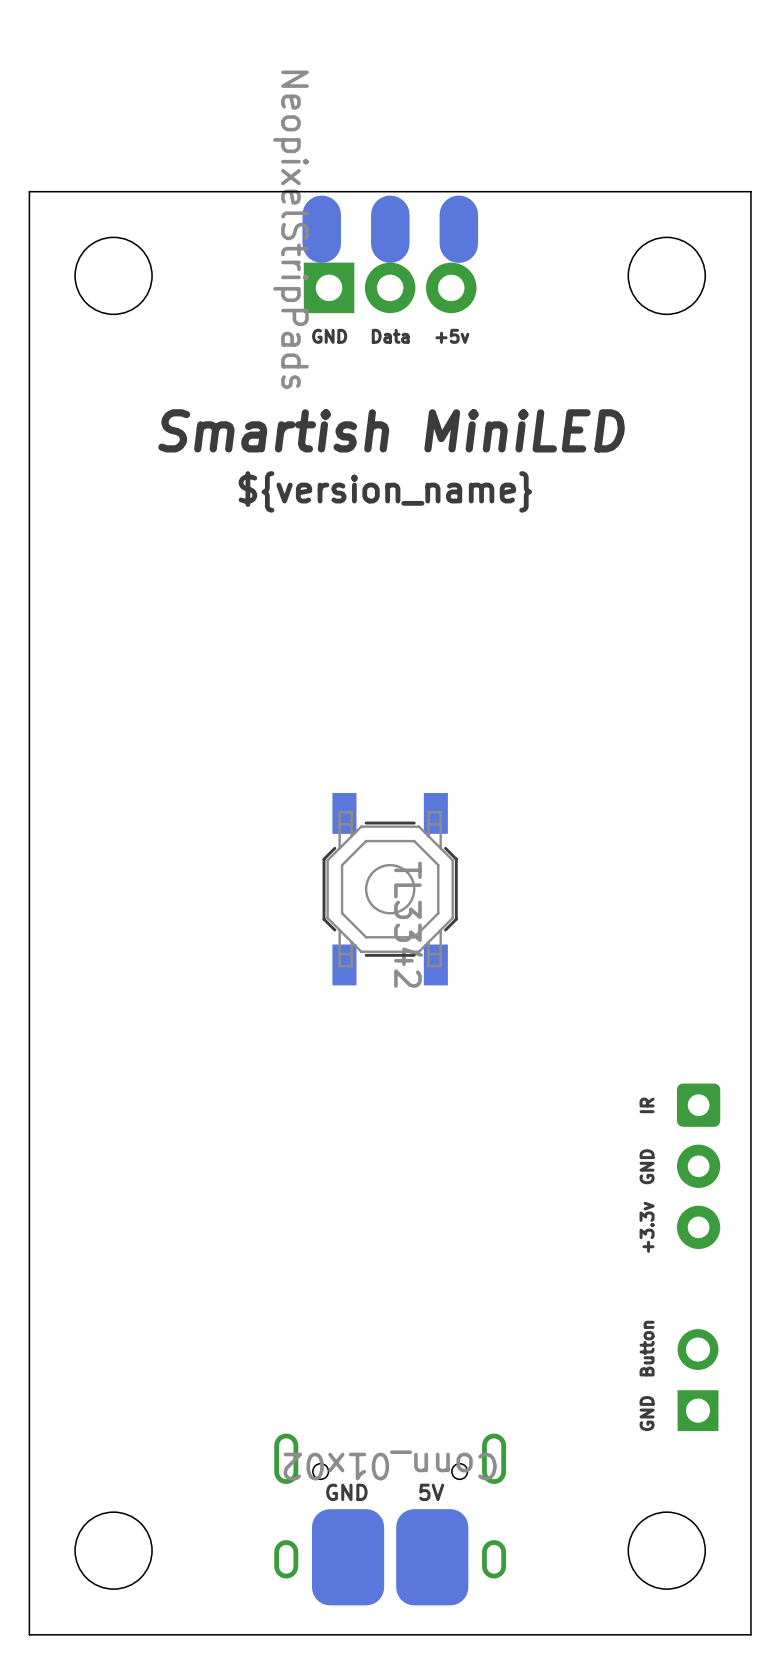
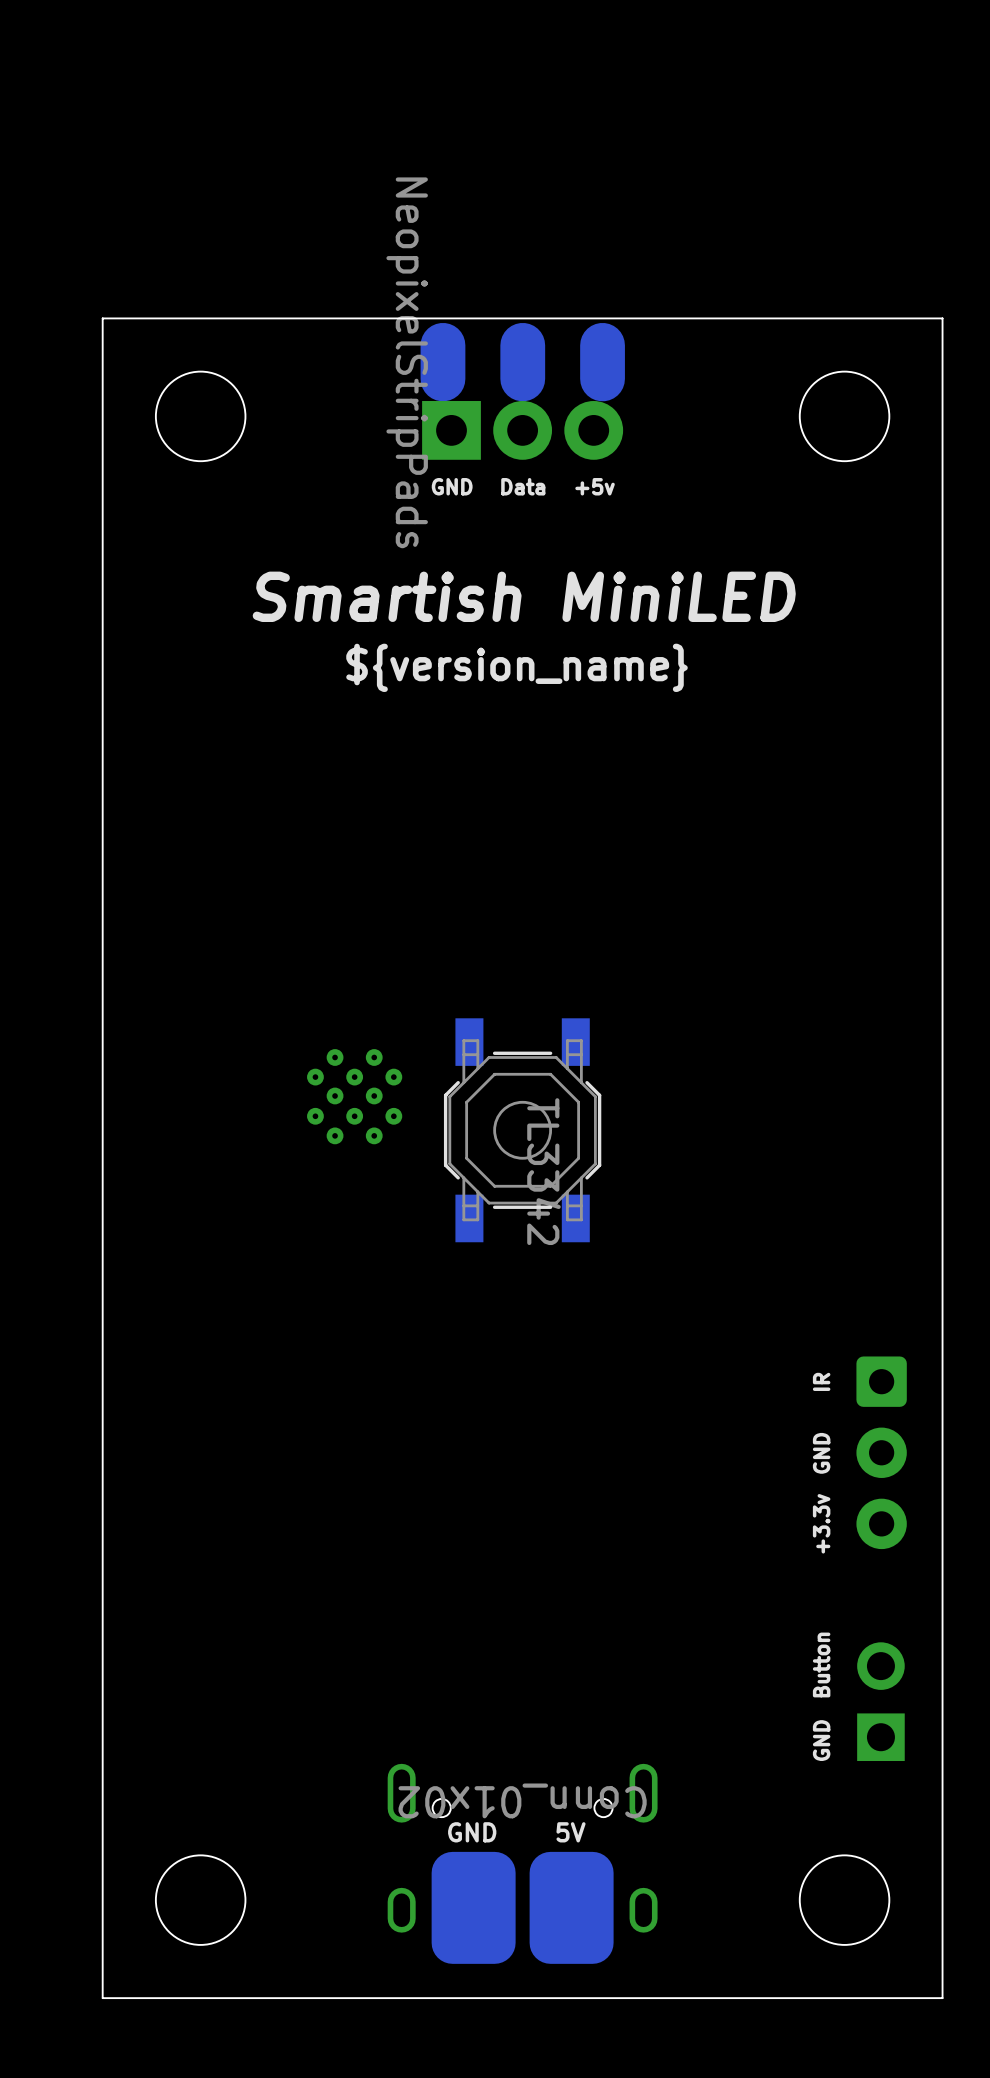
part: none -> (354, 1096)

